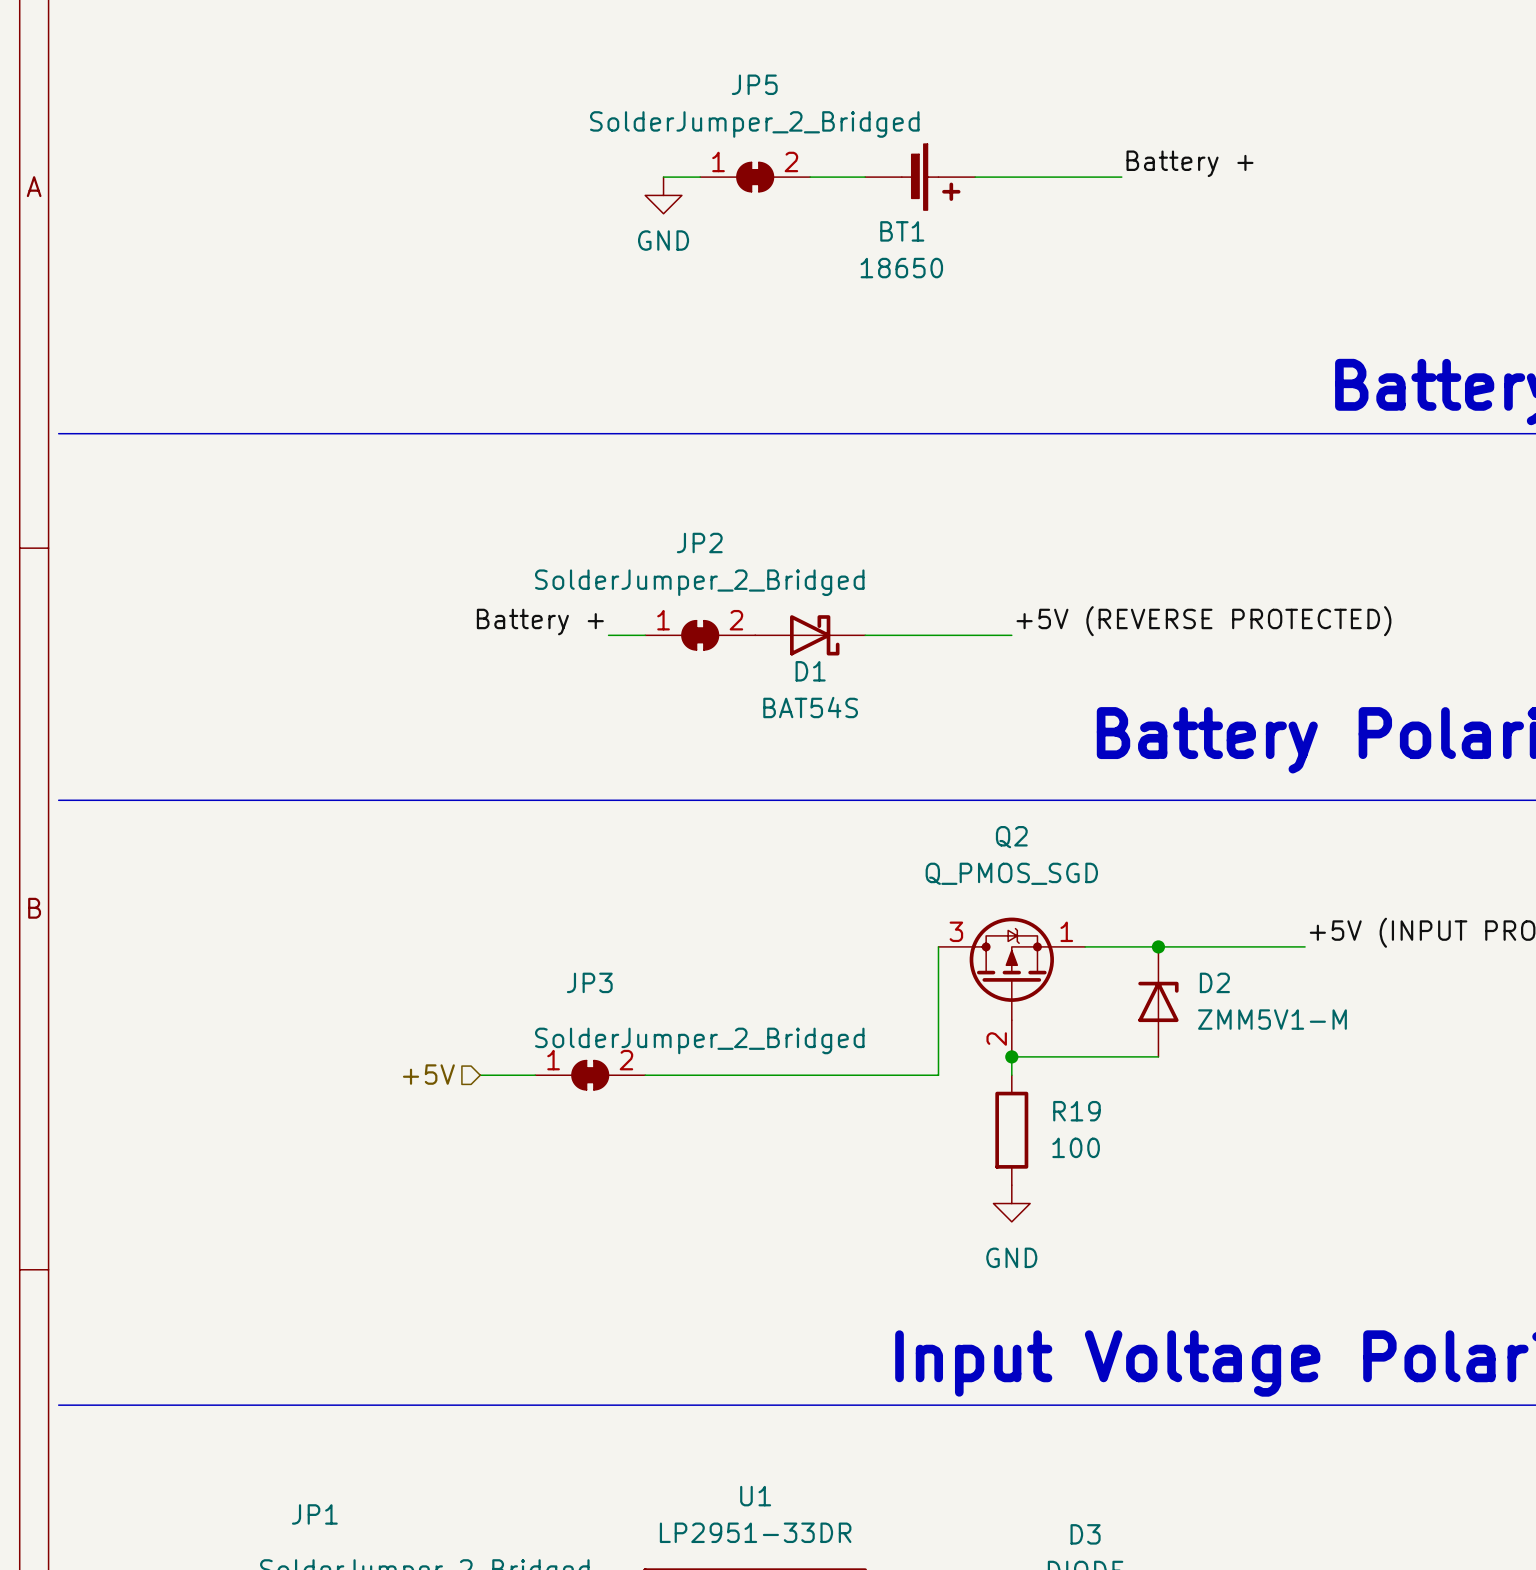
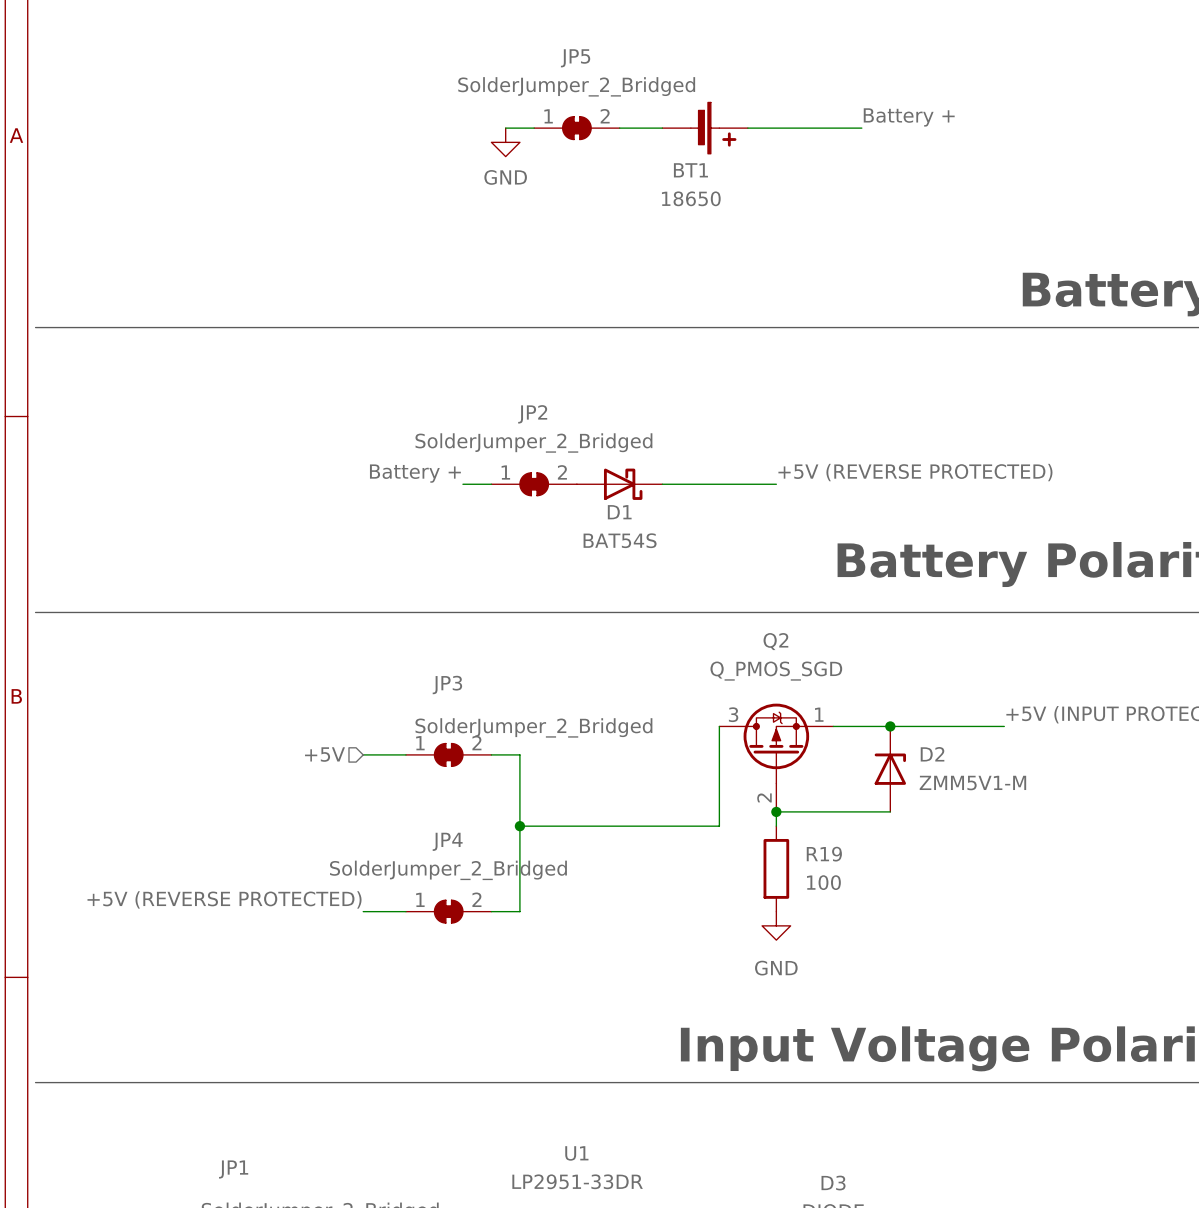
wire: none -> (491, 754) (519, 754) (519, 911) (491, 911)
hierarchical label position: +5V (428, 1074) -> +5V (325, 754)
wire: (480, 1075) (535, 1075) -> (363, 754) (405, 754)
JP3 position: (590, 1075) -> (448, 754)
wire: (645, 1075) (681, 1075) -> none
junction: none -> (519, 826)
label: none -> +5V (REVERSE PROTECTED) (224, 899)
wire: none -> (363, 911) (405, 911)
JP4: none -> SolderJumper_2_Bridged (448, 911)

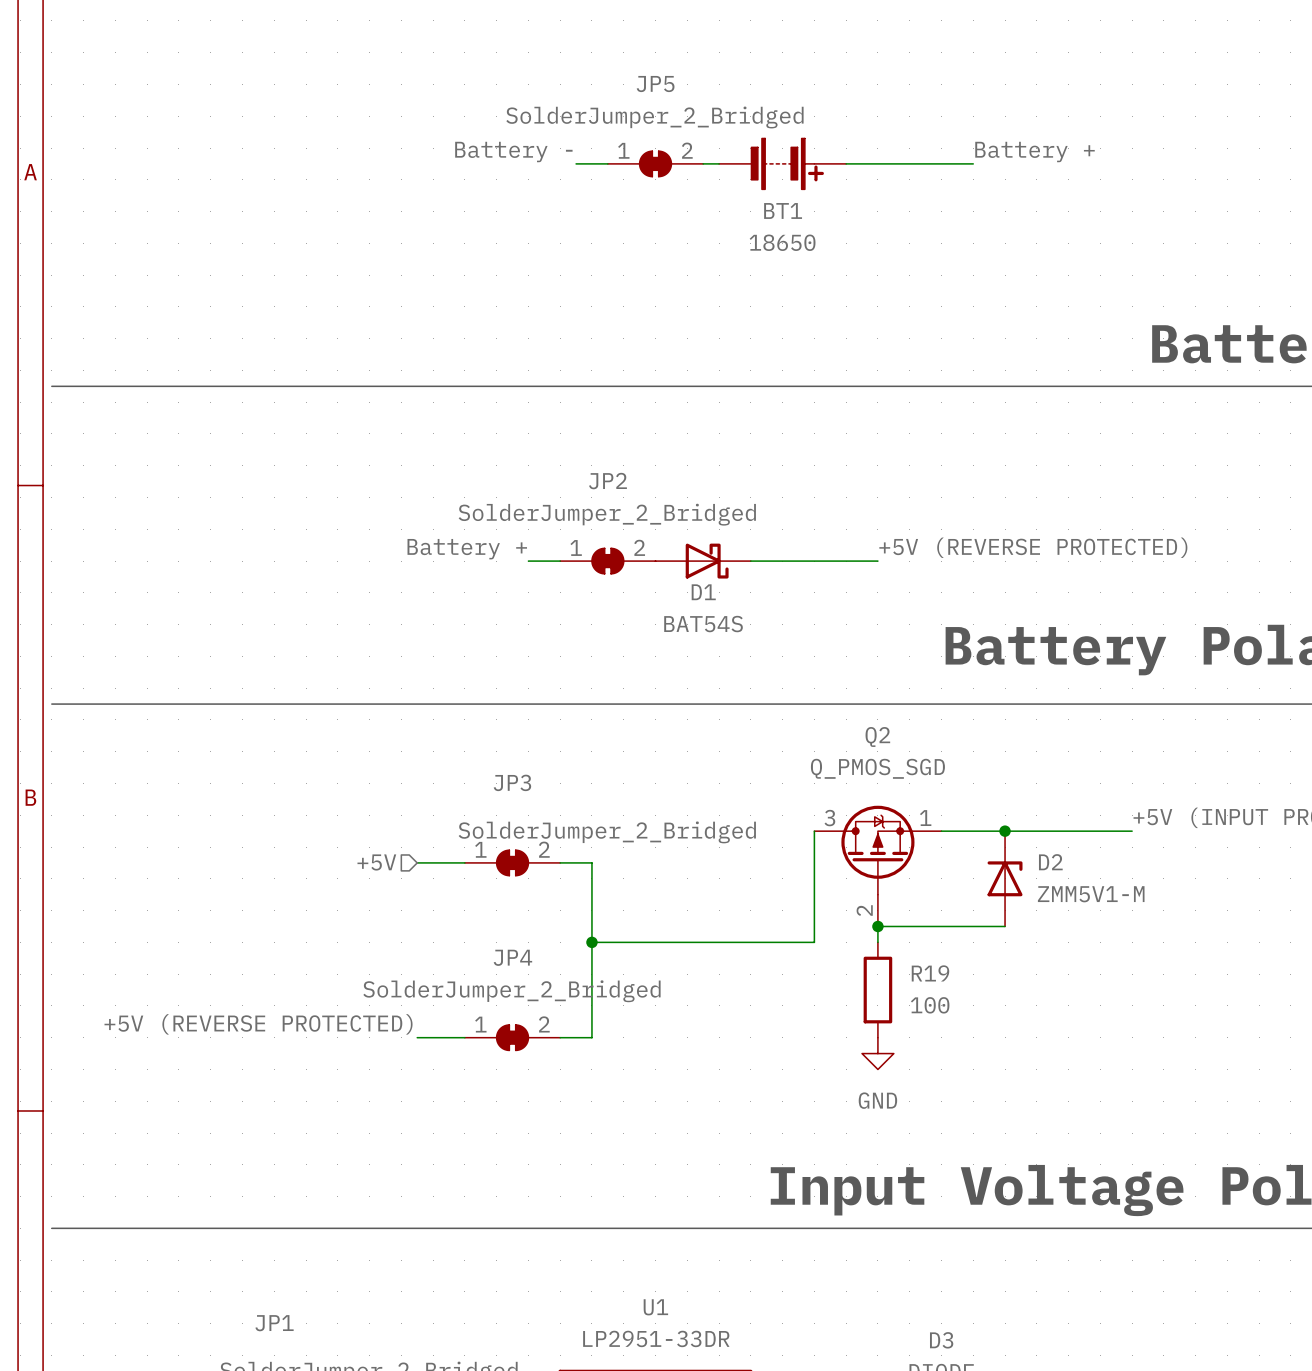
BT1 symbol: [662, 102, 748, 154] -> [719, 138, 847, 190]
label: none -> Battery - (513, 152)
power symbol: GND (505, 142) -> none

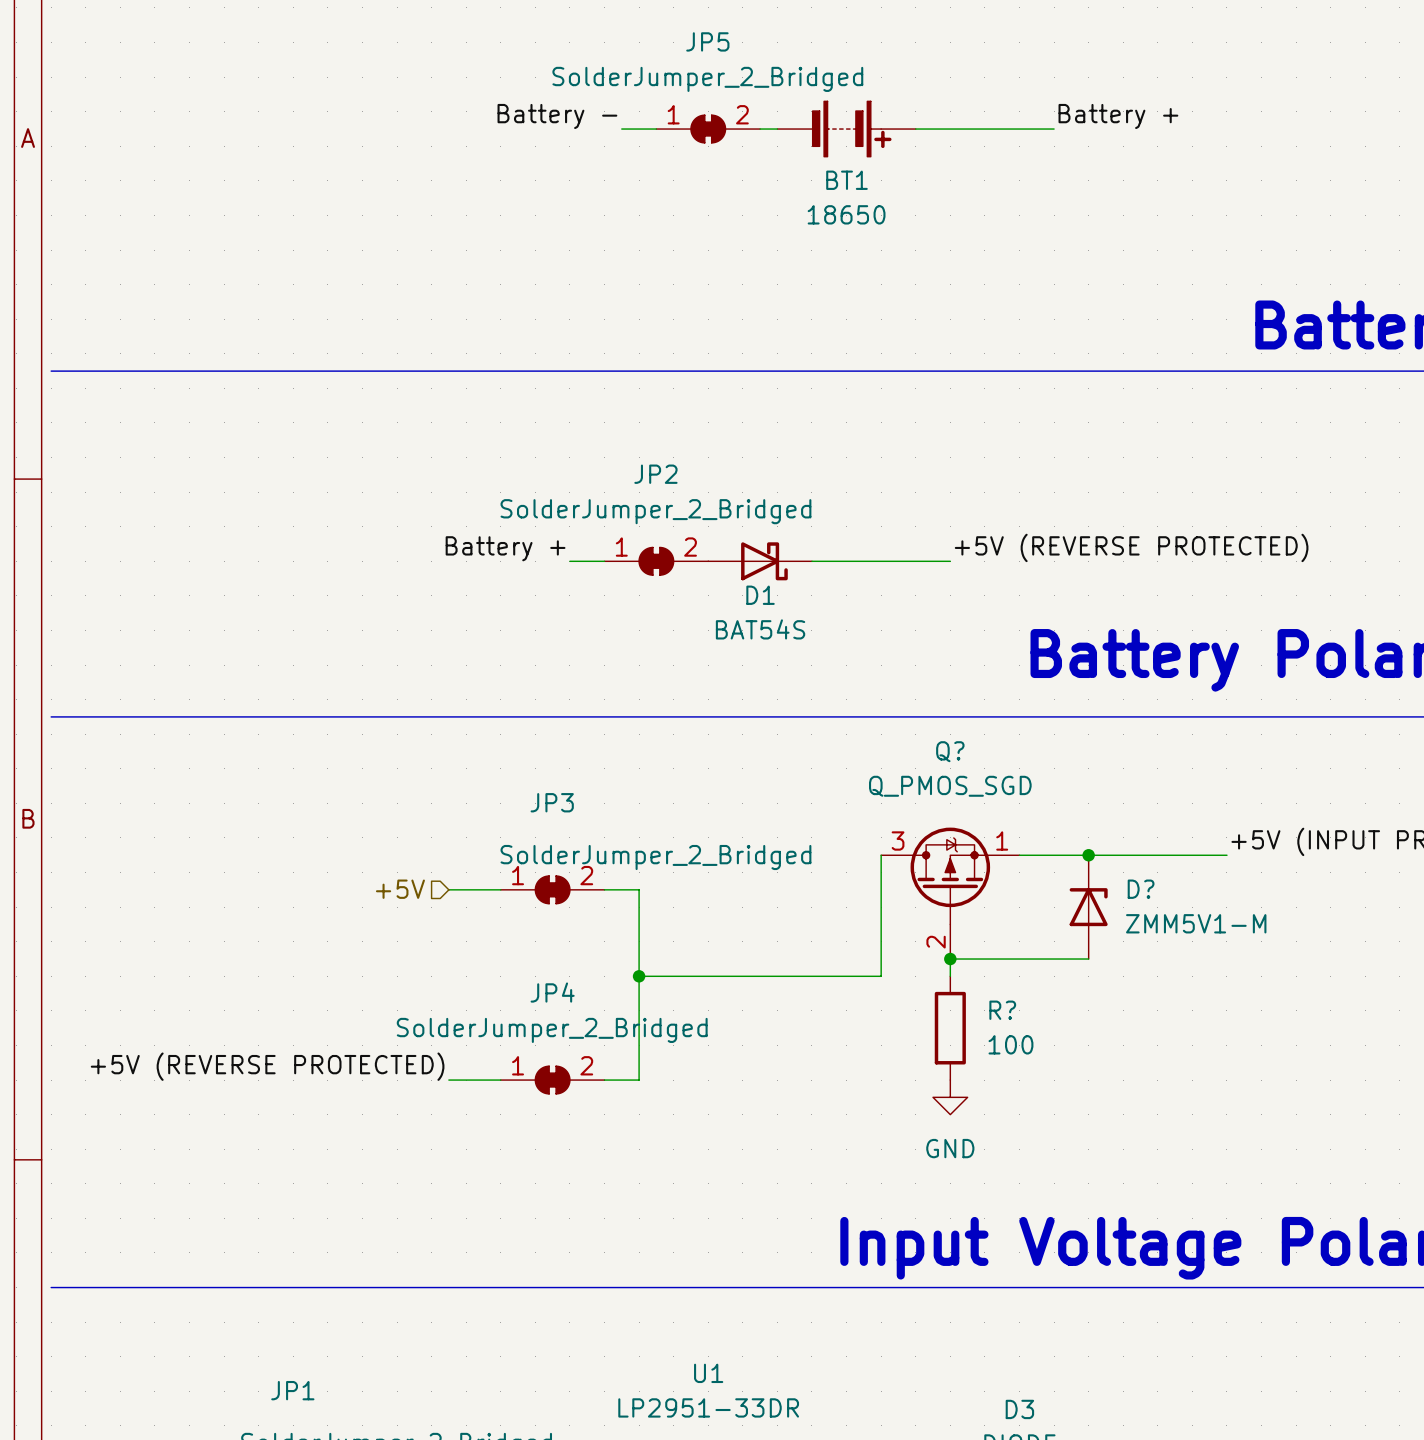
Q2 name: Q2 (877, 736) -> Q? (950, 751)
D2 name: D2 (1050, 862) -> D? (1141, 889)
R19 name: R19 (930, 973) -> R? (1002, 1010)

